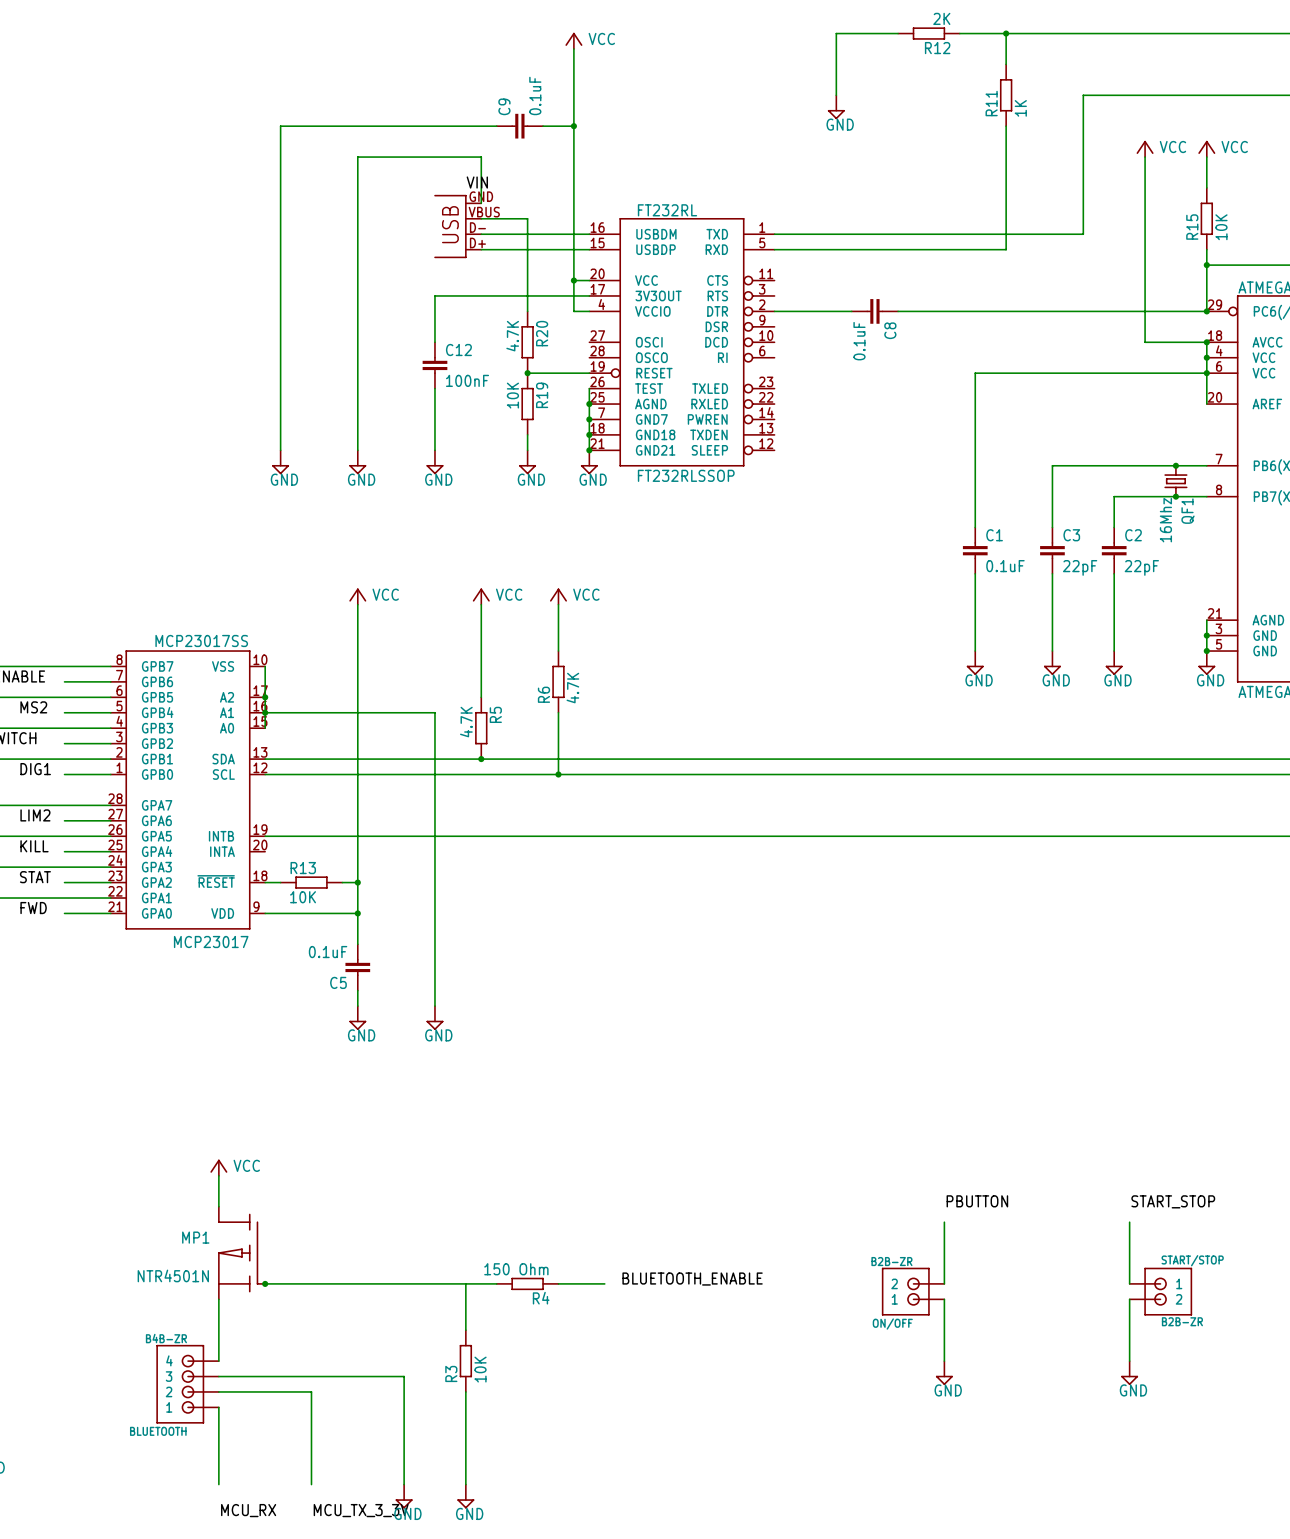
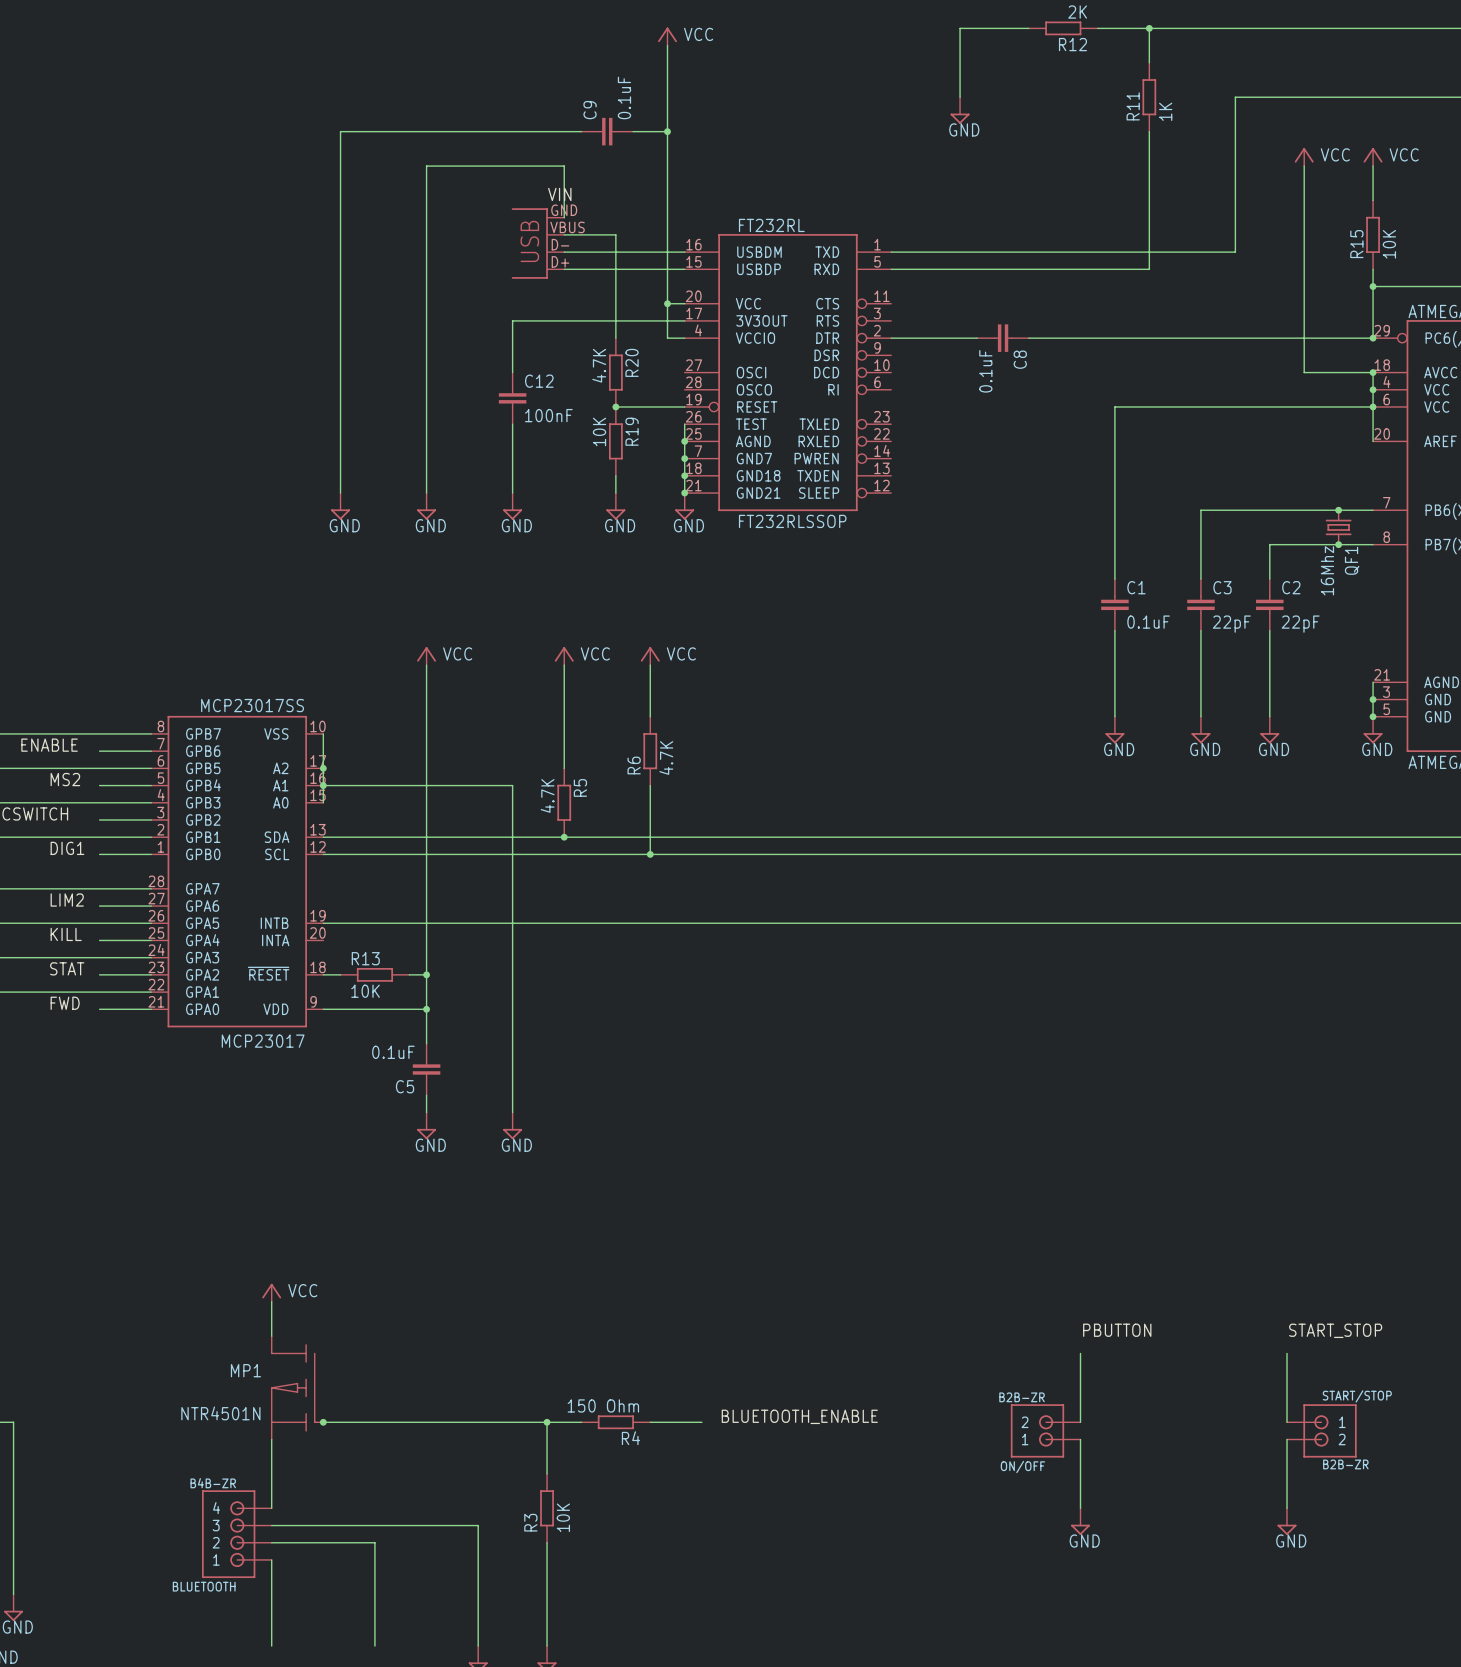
junction: none -> (547, 1422)

